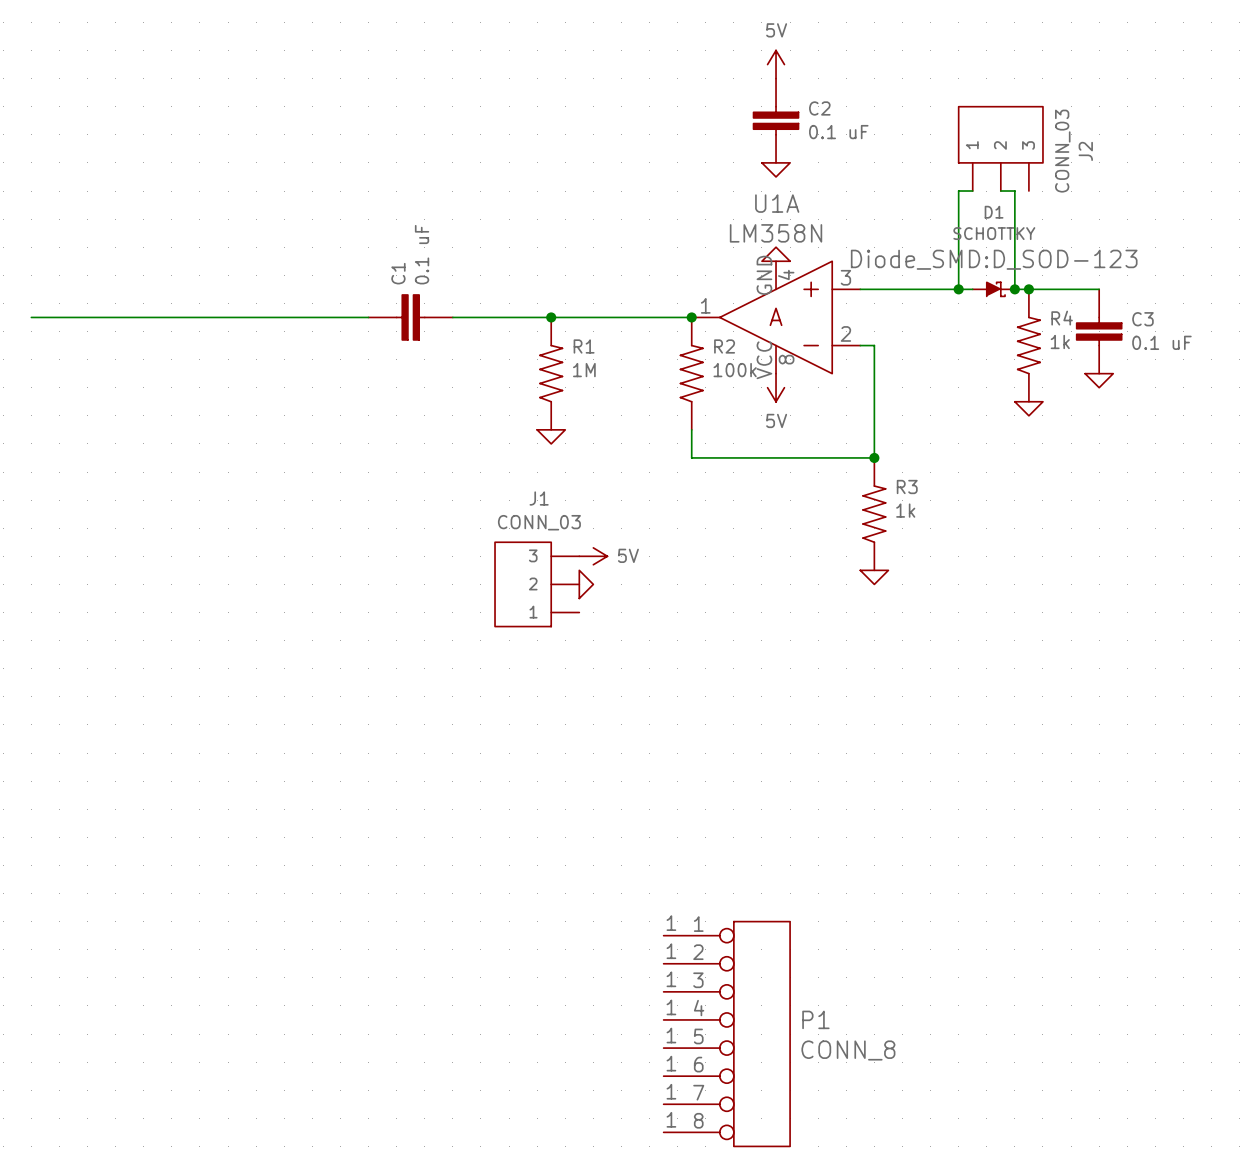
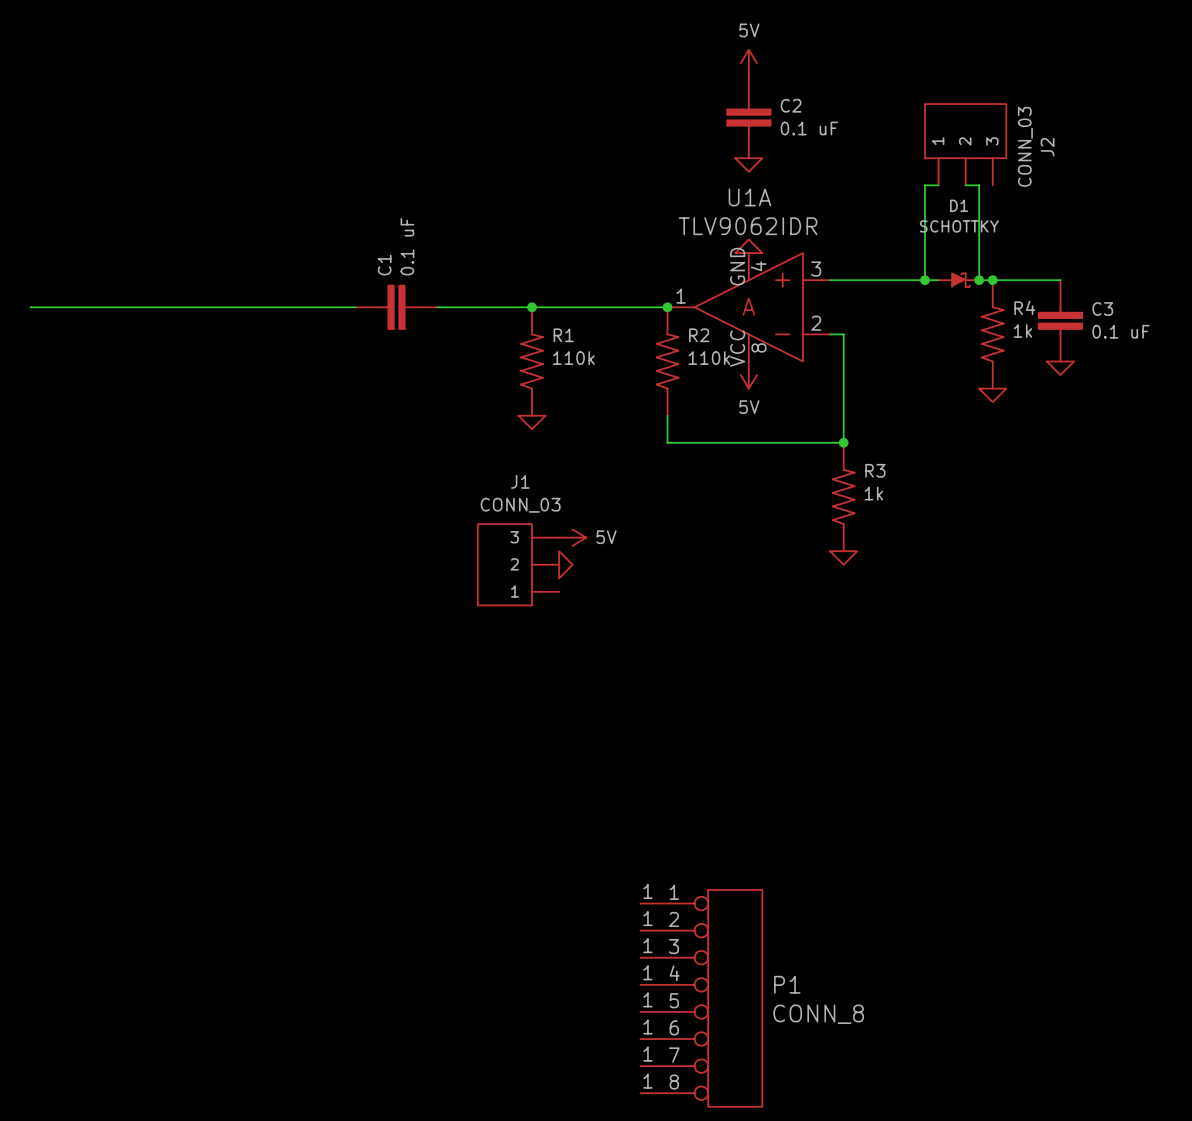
U1A value: LM358N (776, 233) -> TLV9062IDR (748, 226)
D1 text: Diode_SMD:D_SOD-123 (994, 259) -> none
R1 value: 1M (584, 370) -> 110k (573, 358)
R2 value: 100k (735, 370) -> 110k (709, 358)

